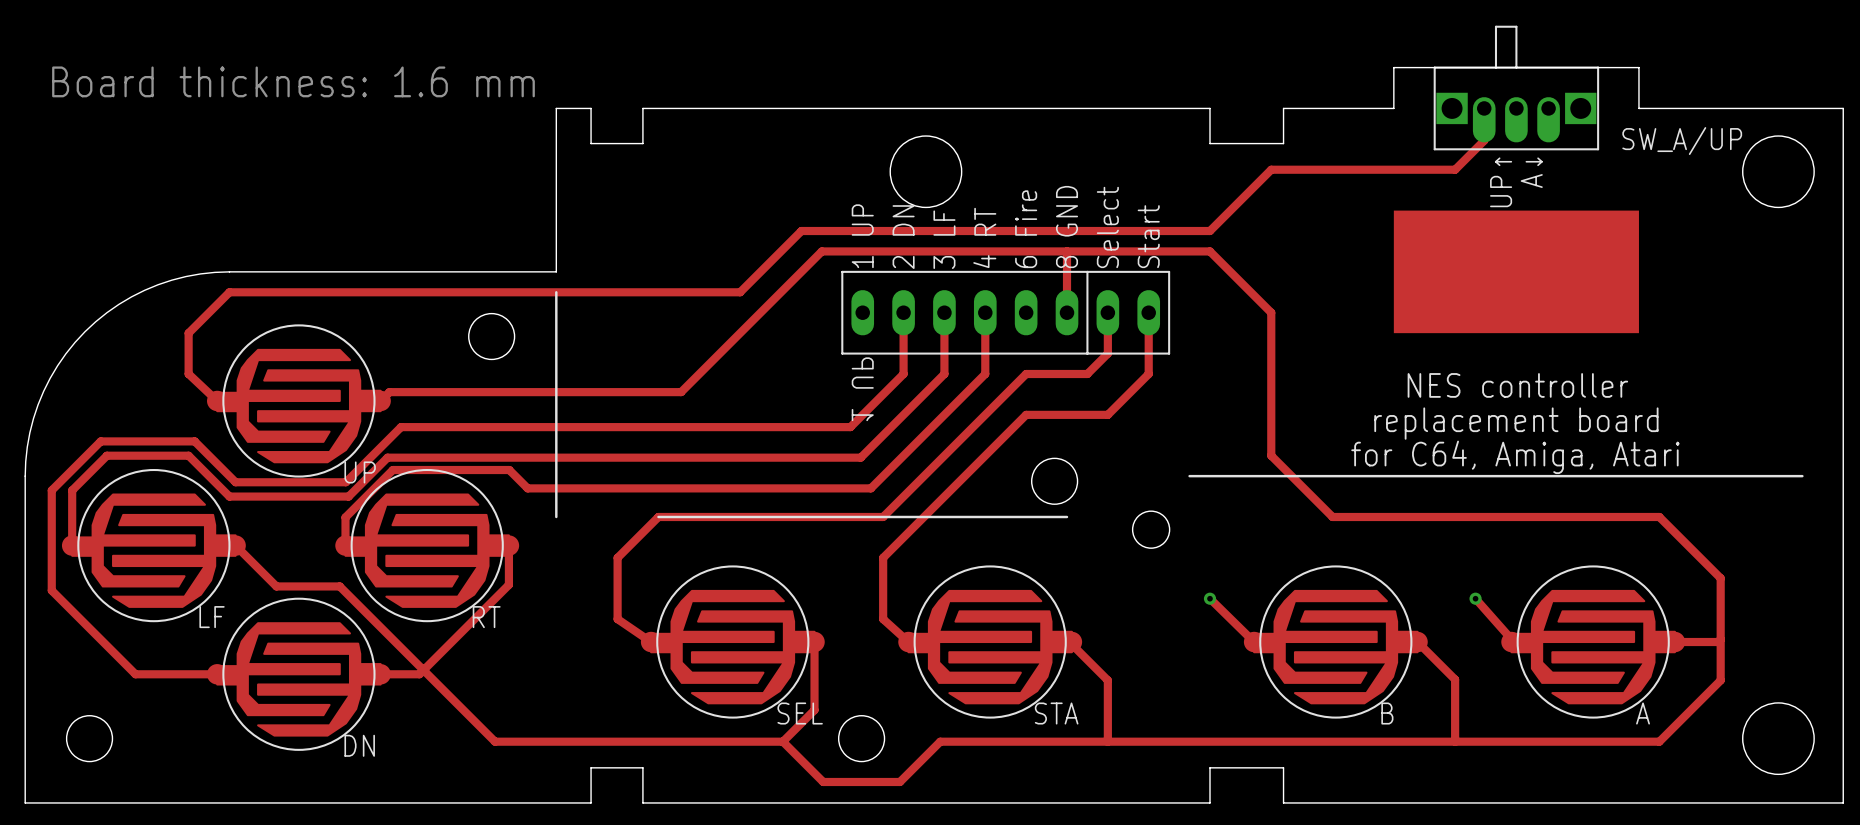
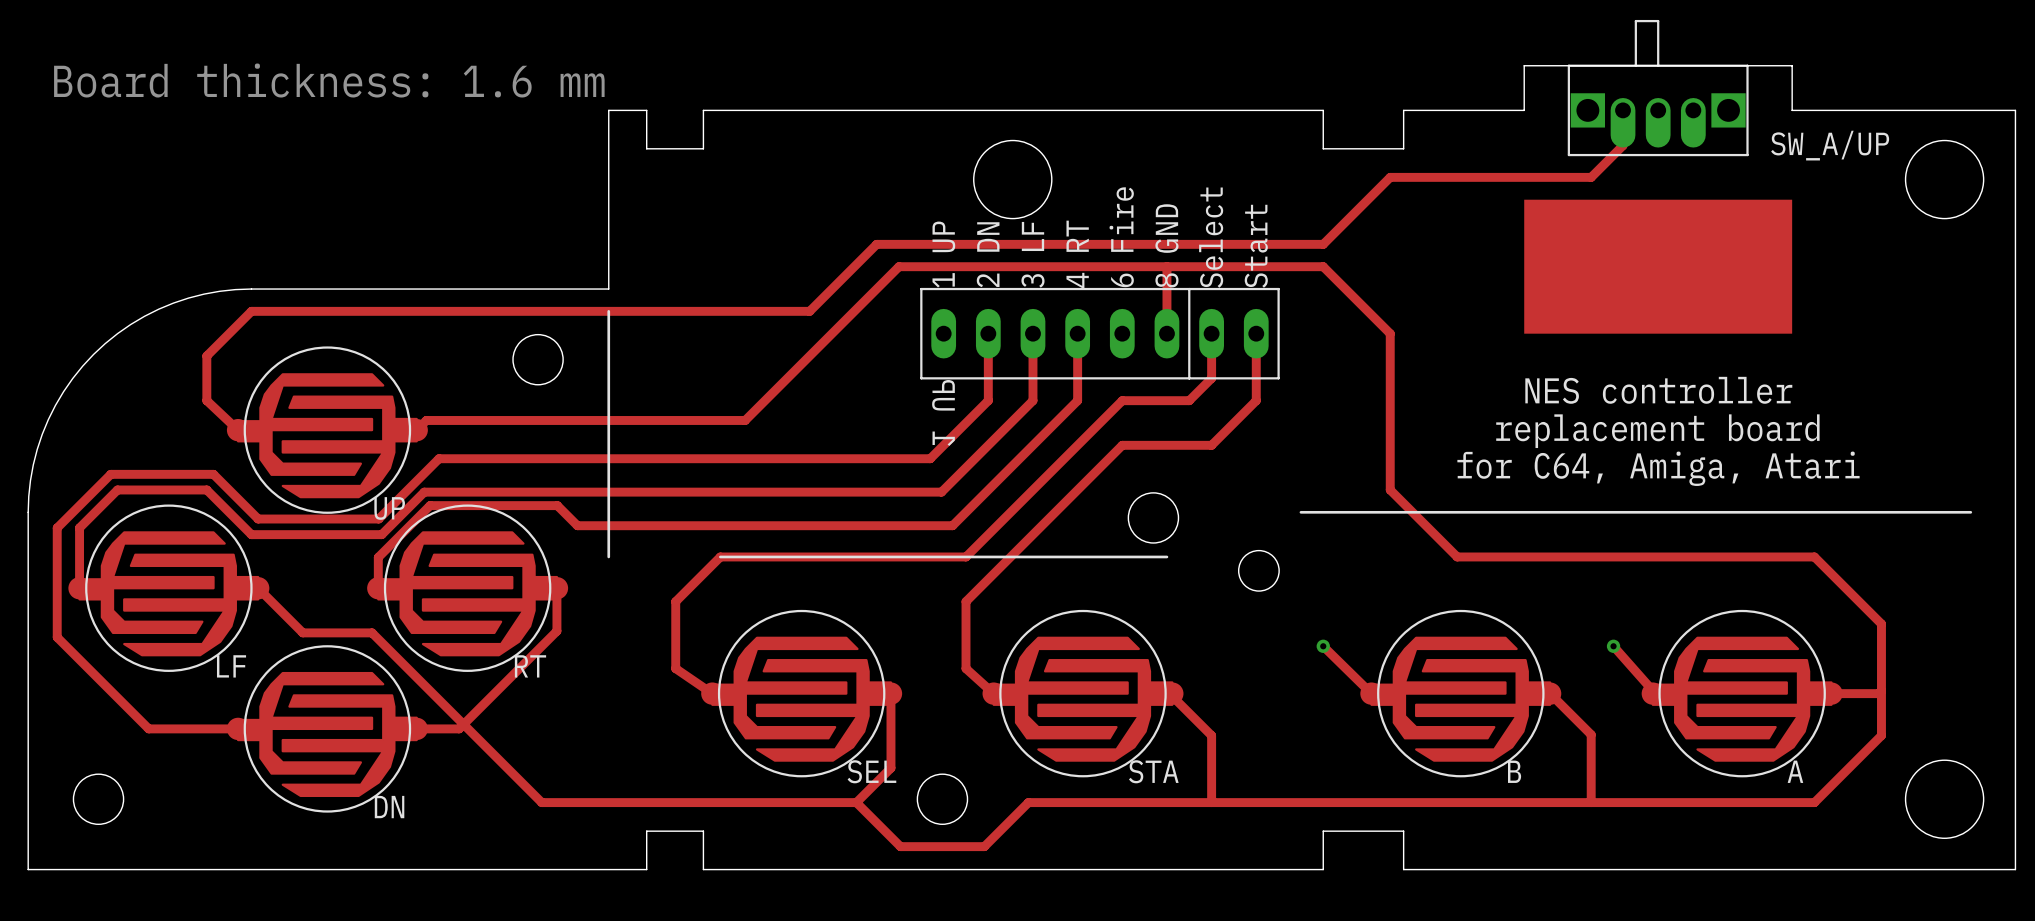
text: A↓ (1531, 172) -> none
text: UP↑ (1501, 182) -> none
drawing position: (1516, 271) -> (1658, 266)
text position: NES controller (1517, 385) -> NES controller (1658, 390)
text position: replacement board (1516, 423) -> replacement board (1657, 431)
text position: for C64, Amiga, Atari (1515, 457) -> for C64, Amiga, Atari (1658, 468)

